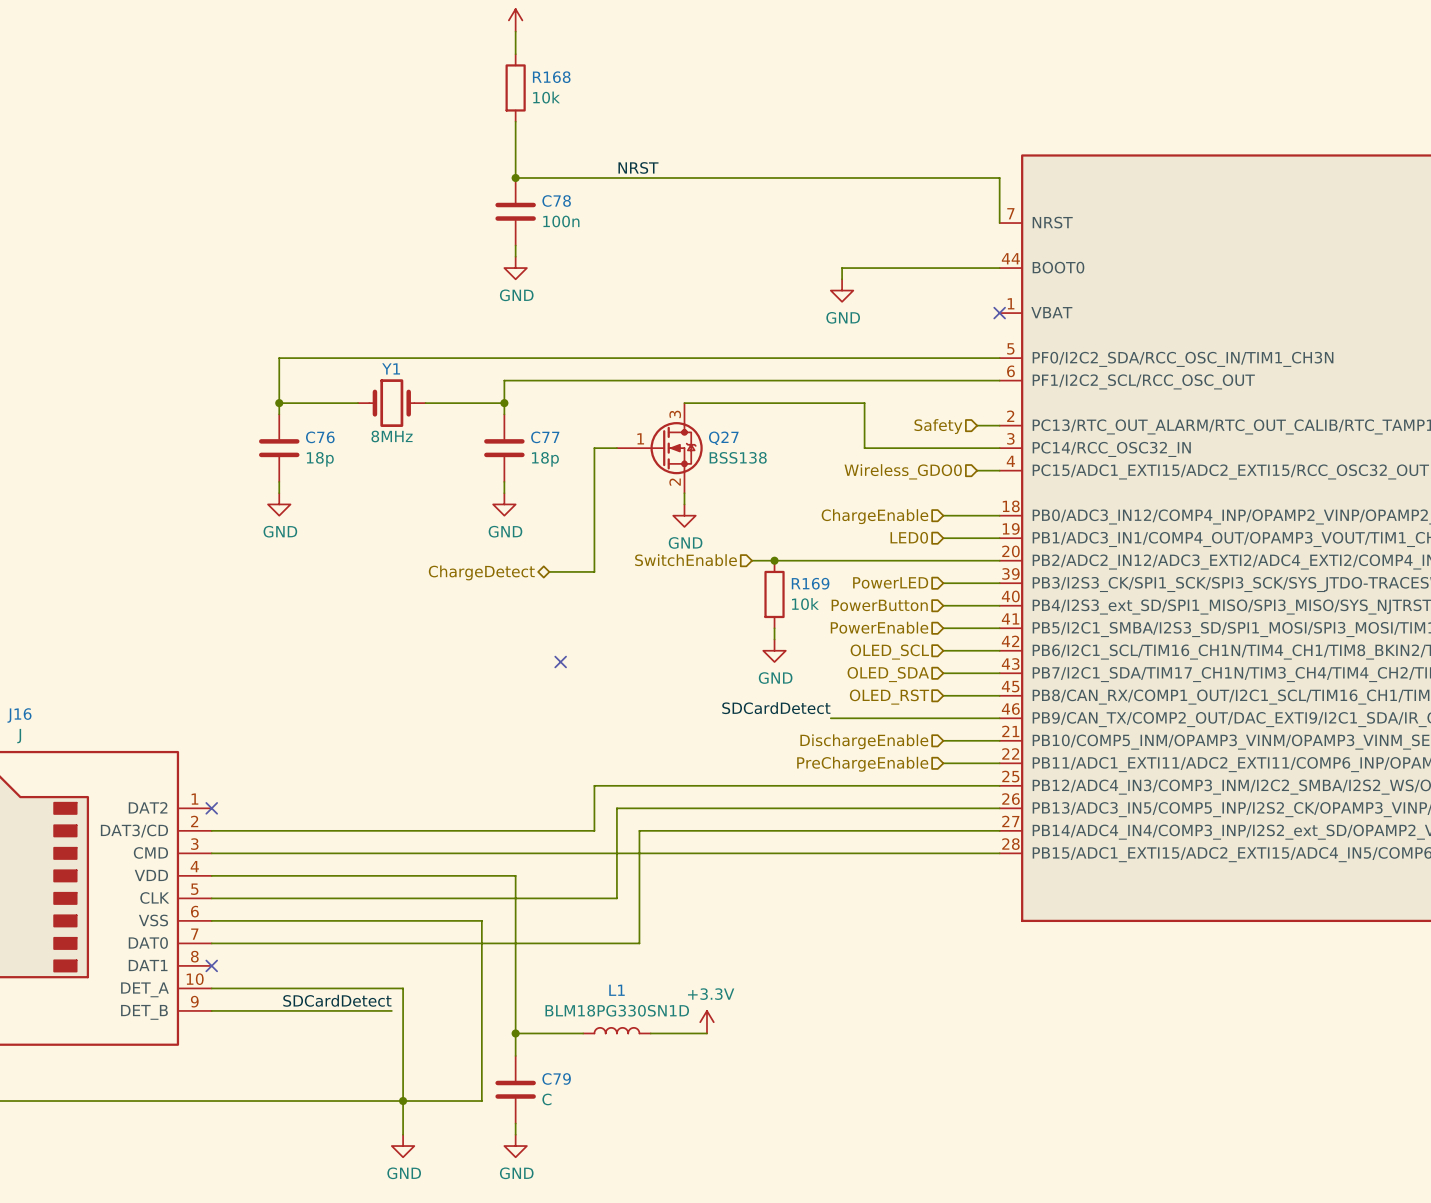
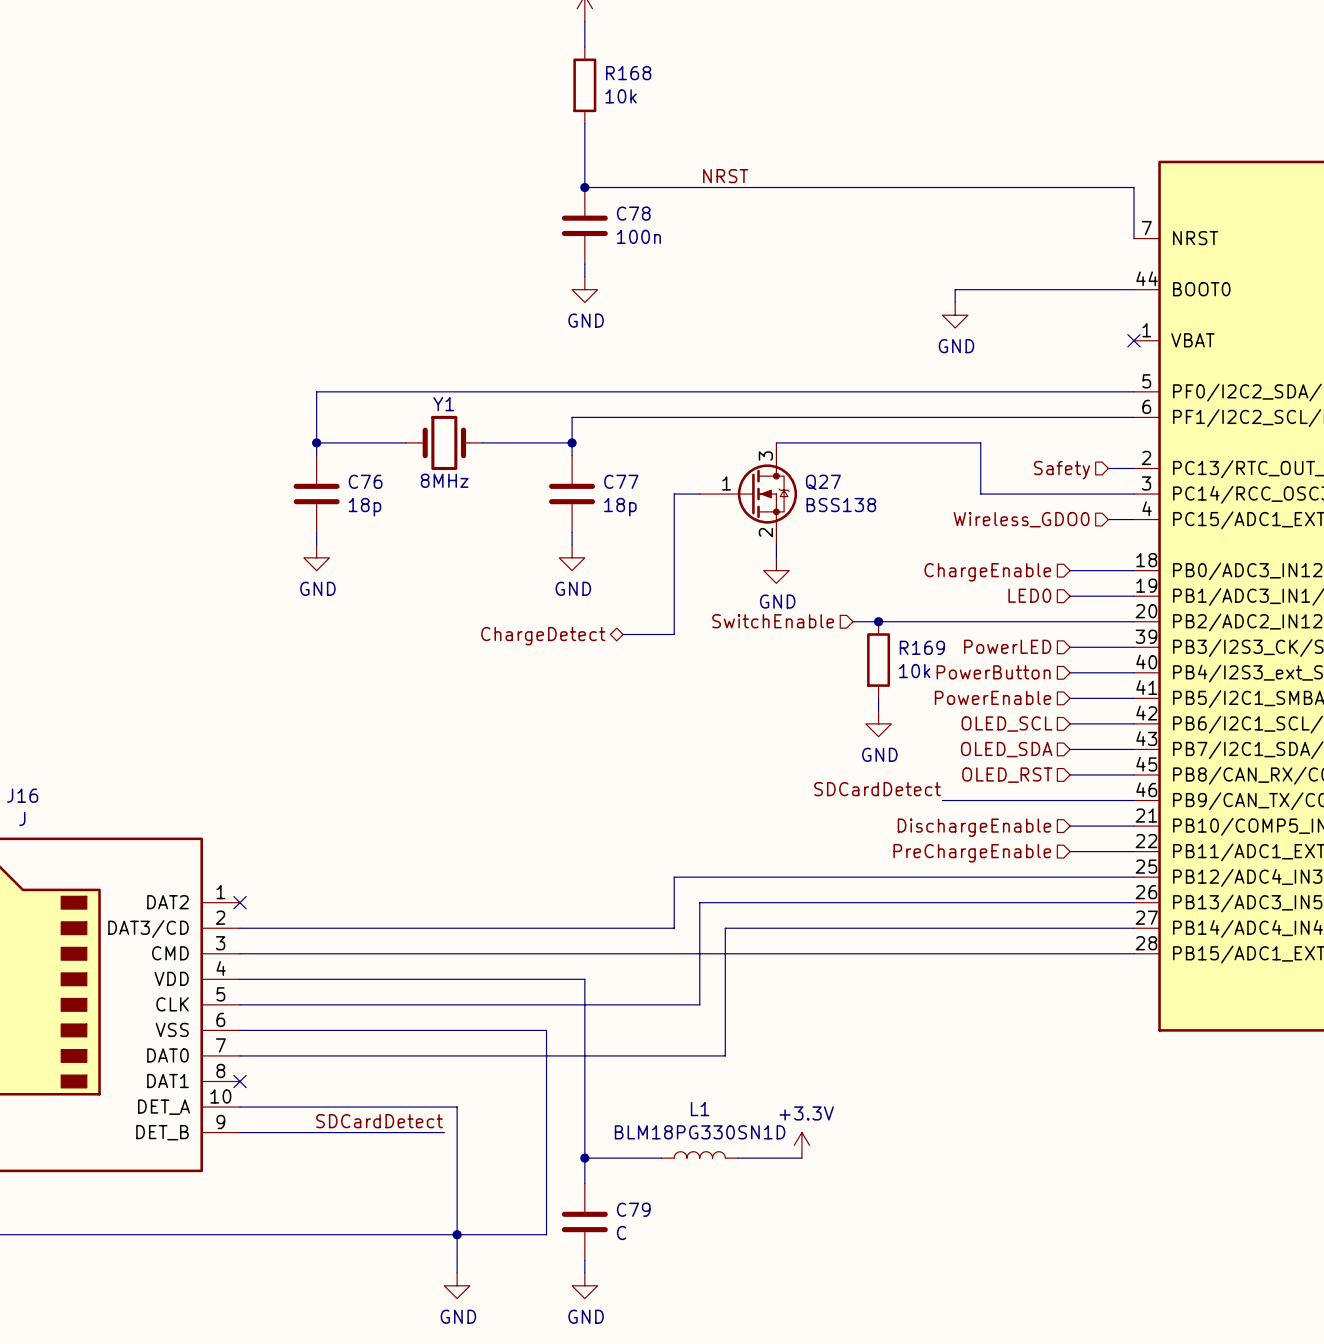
no-connect mark: (560, 662) -> none

